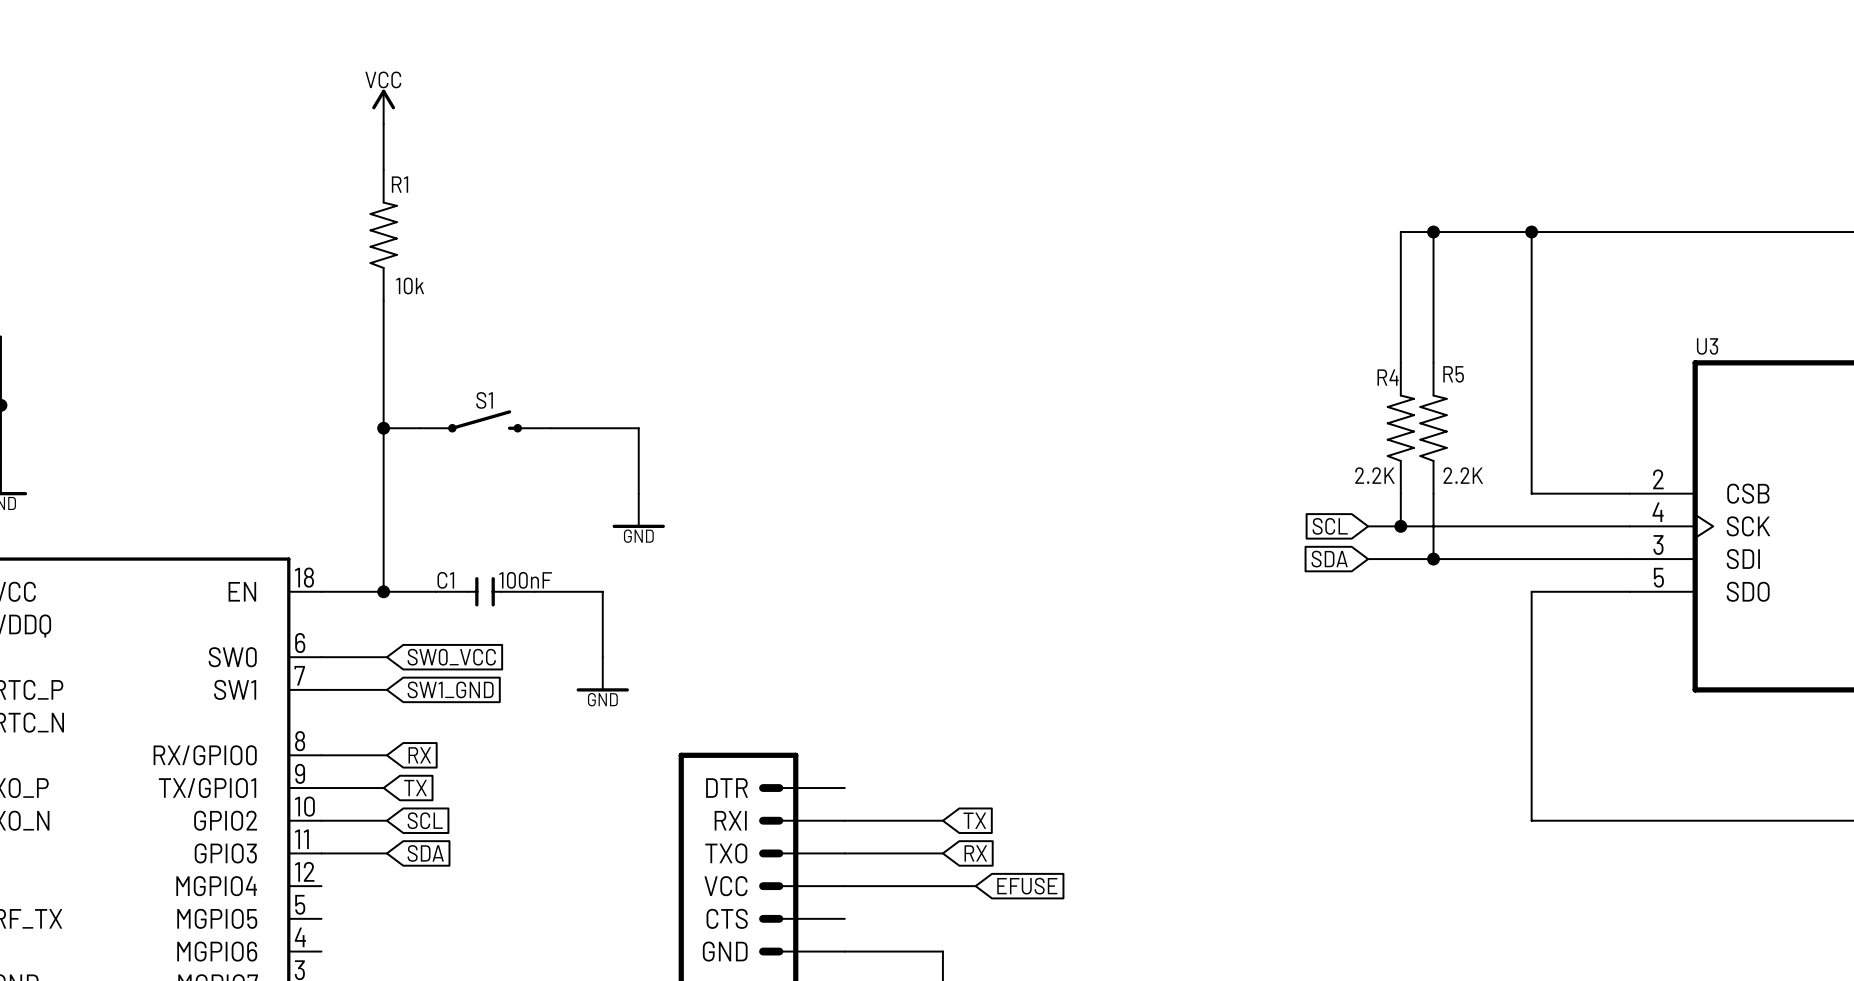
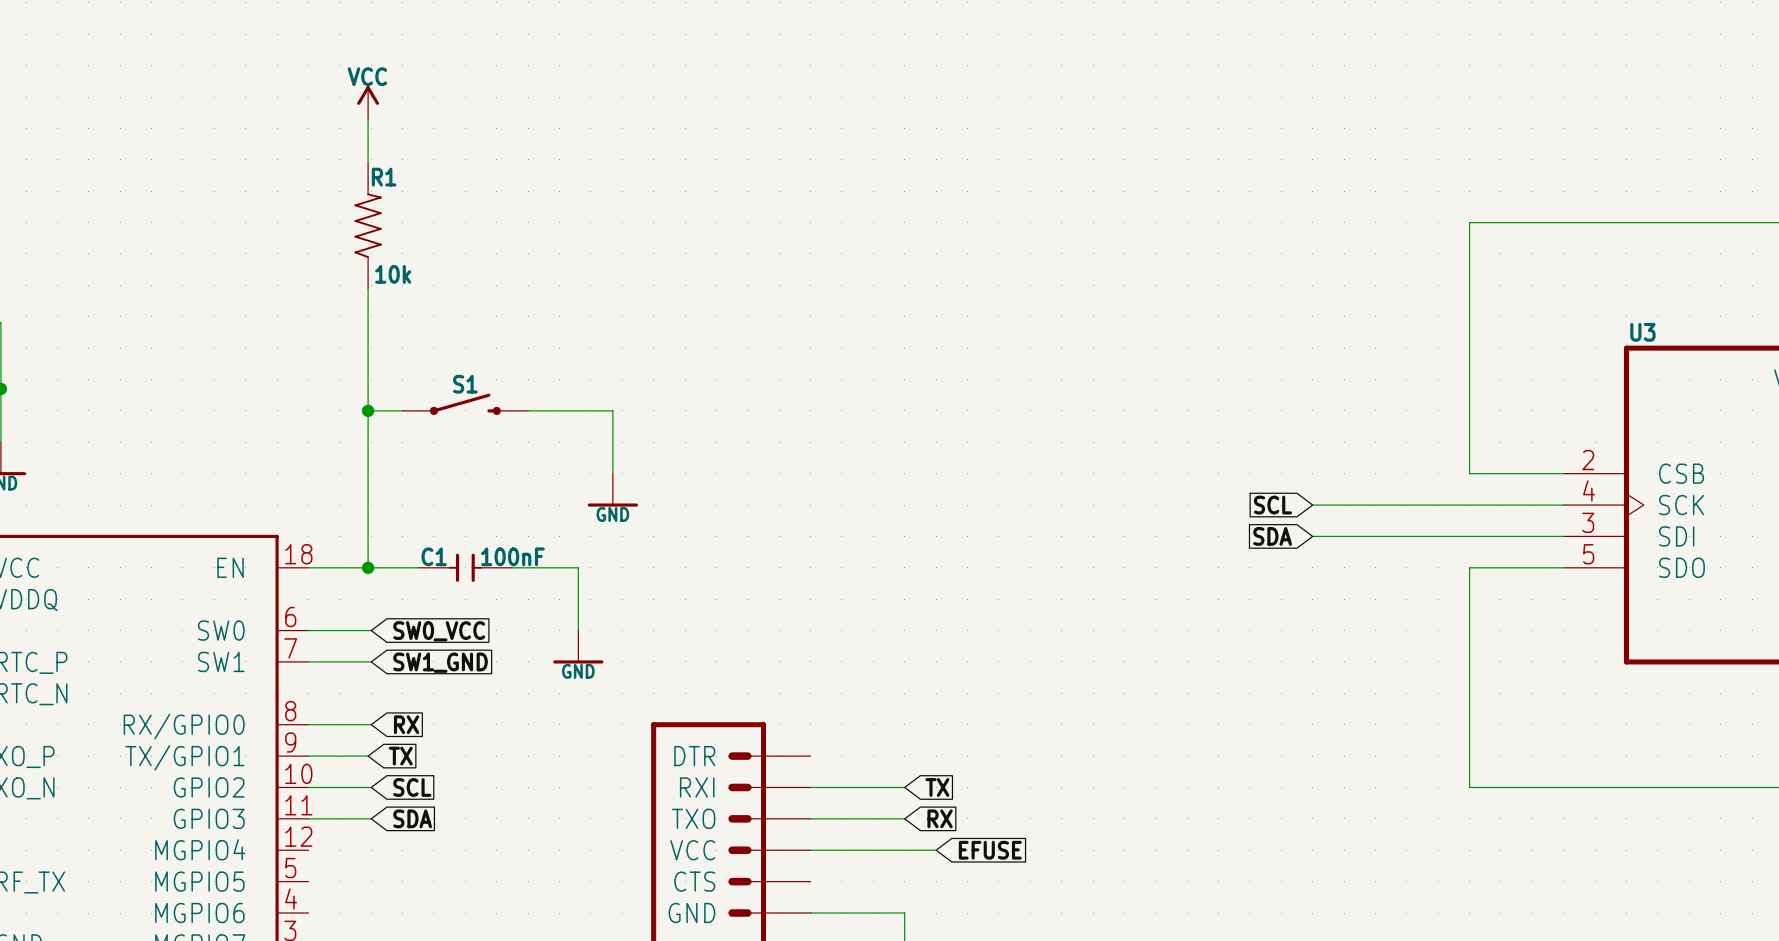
wire: (1433, 232) (1433, 362) -> none
junction: (1433, 232) -> none
wire: (1531, 232) (1400, 232) (1400, 362) -> none
junction: (1531, 232) -> none
R4: 2.2K (1400, 428) -> none
R5: 2.2K (1433, 428) -> none
wire: (1400, 493) (1400, 526) -> none
wire: (1433, 493) (1433, 559) -> none
junction: (1400, 526) -> none
junction: (1433, 559) -> none

